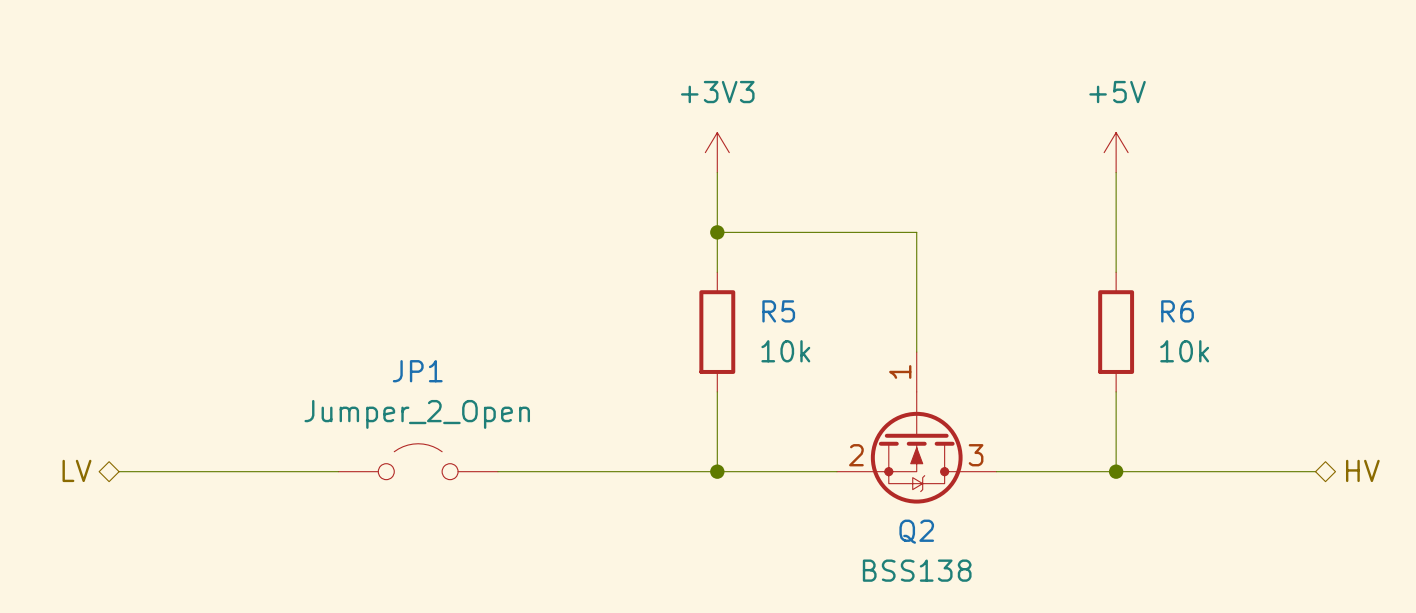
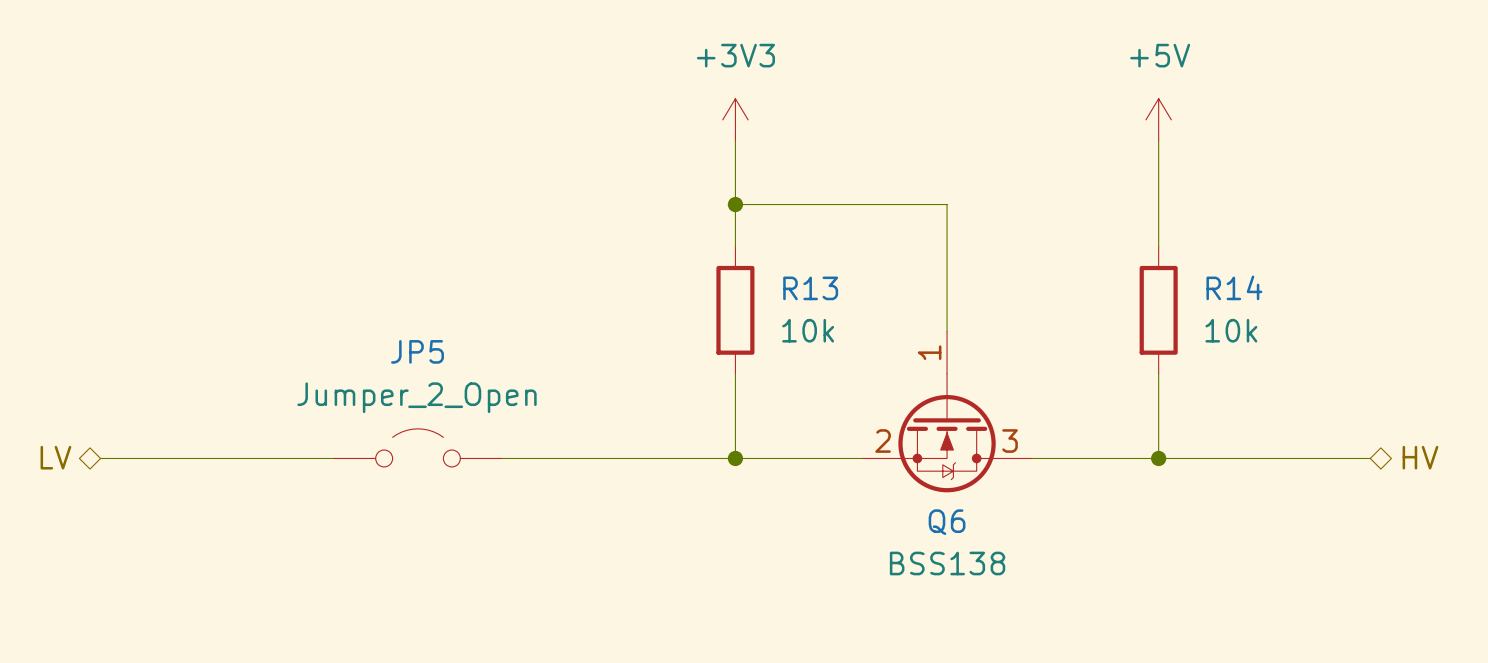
R5 name: R5 (778, 311) -> R13 (810, 288)
R6 name: R6 (1177, 311) -> R14 (1234, 287)
JP1 name: JP1 (417, 371) -> JP5 (417, 351)
Q2 name: Q2 (916, 531) -> Q6 (947, 522)

